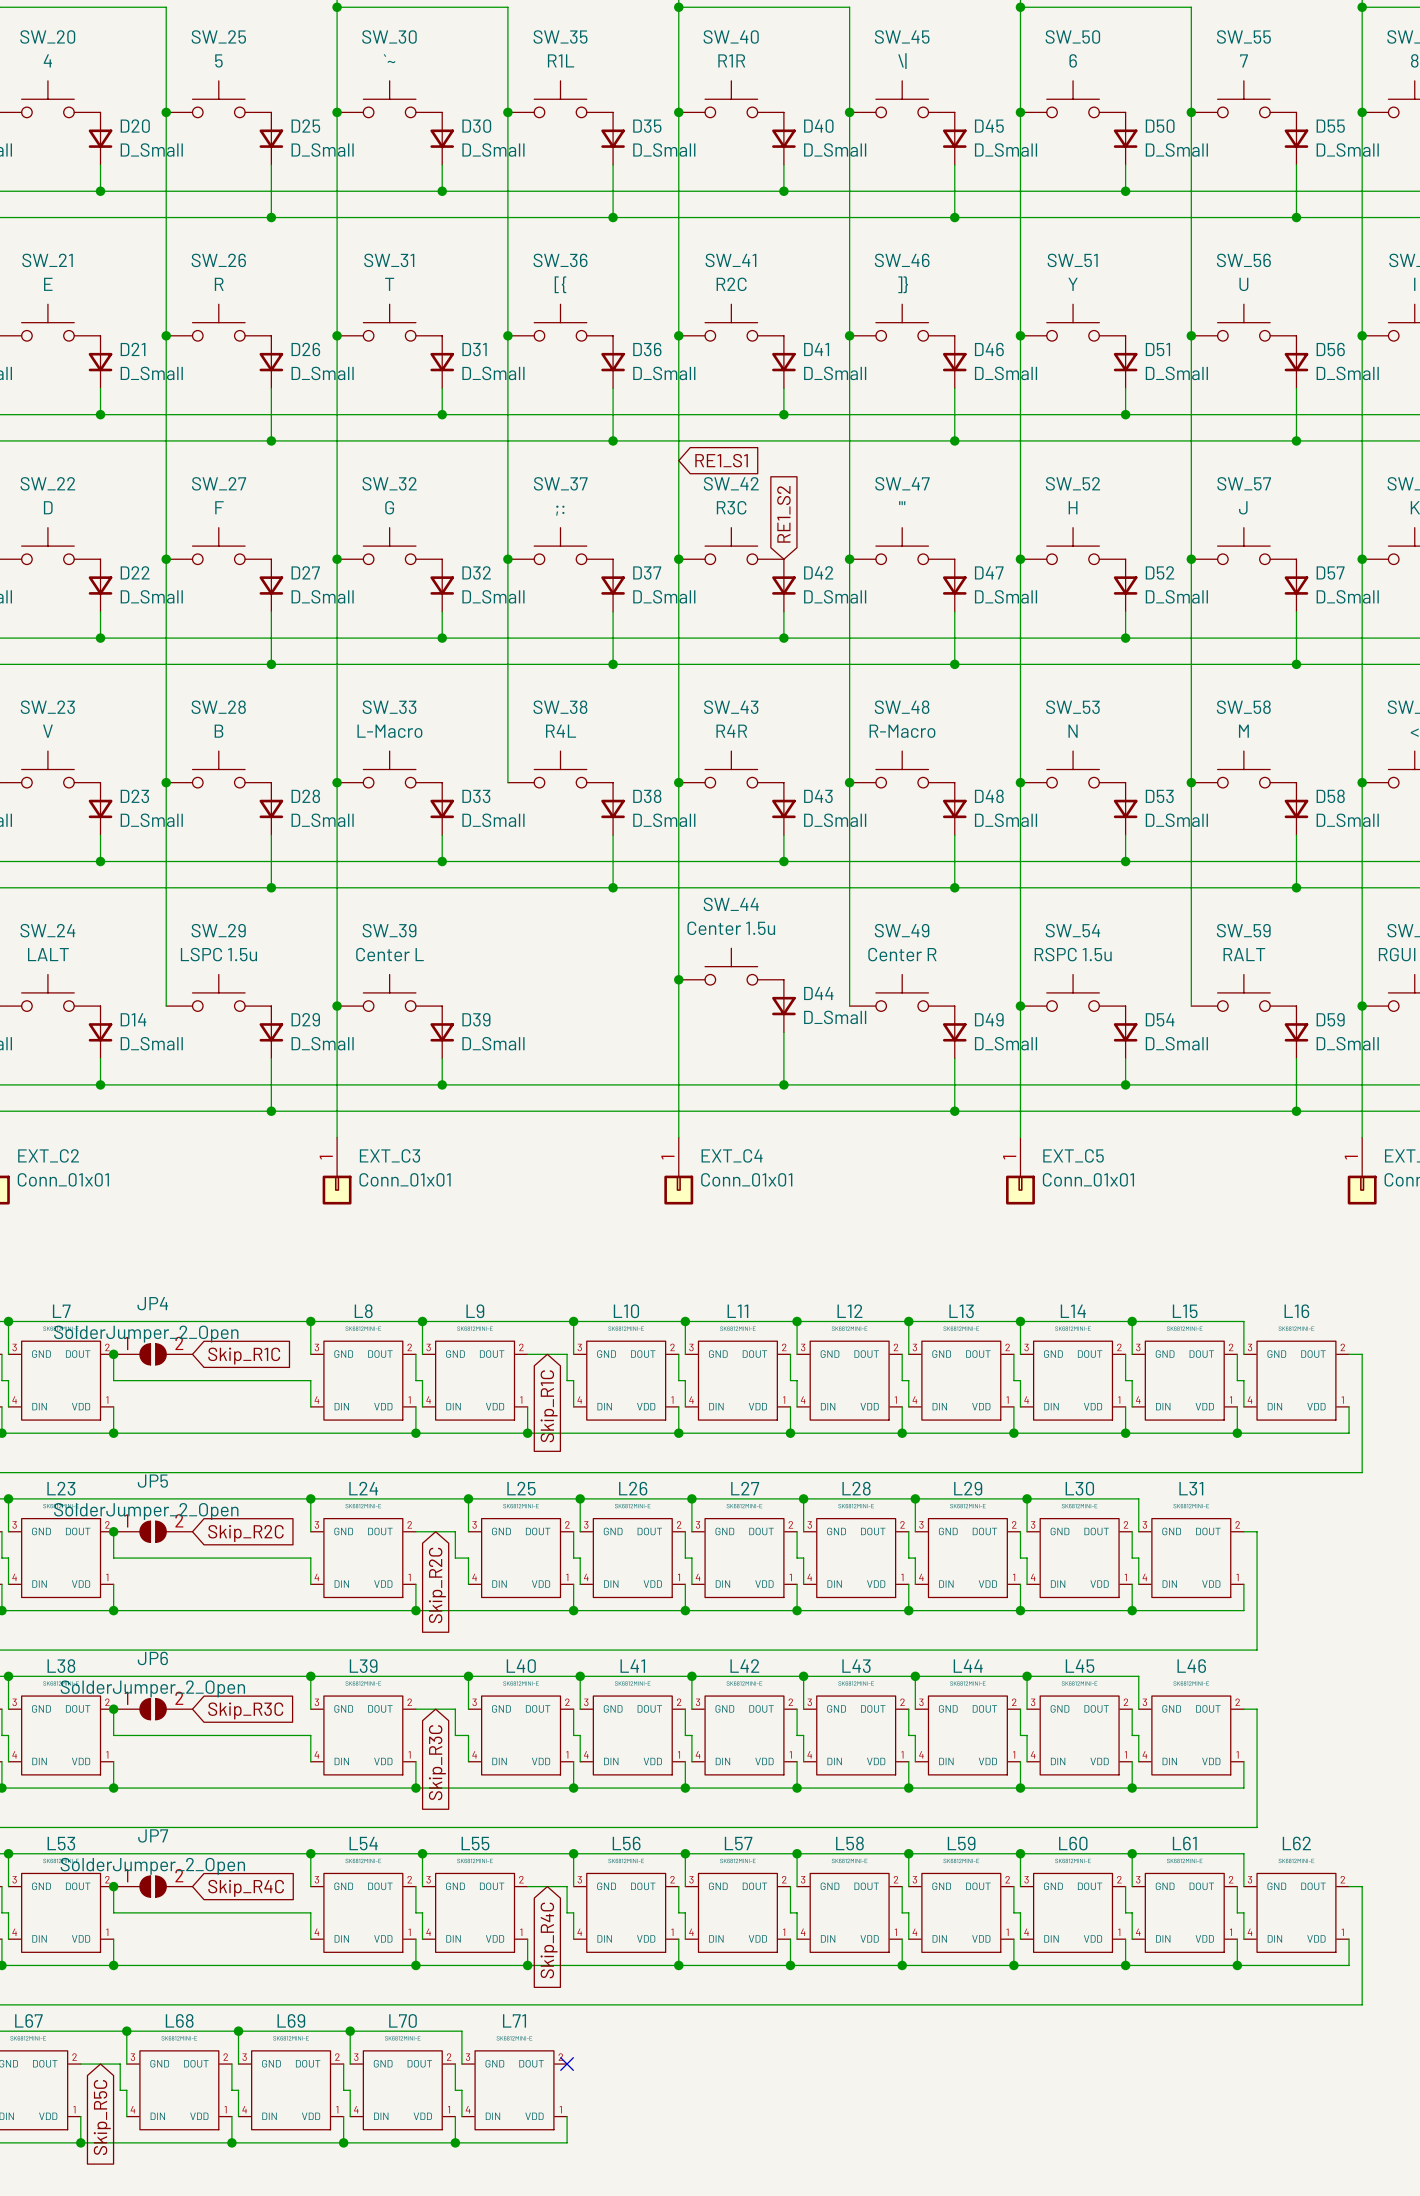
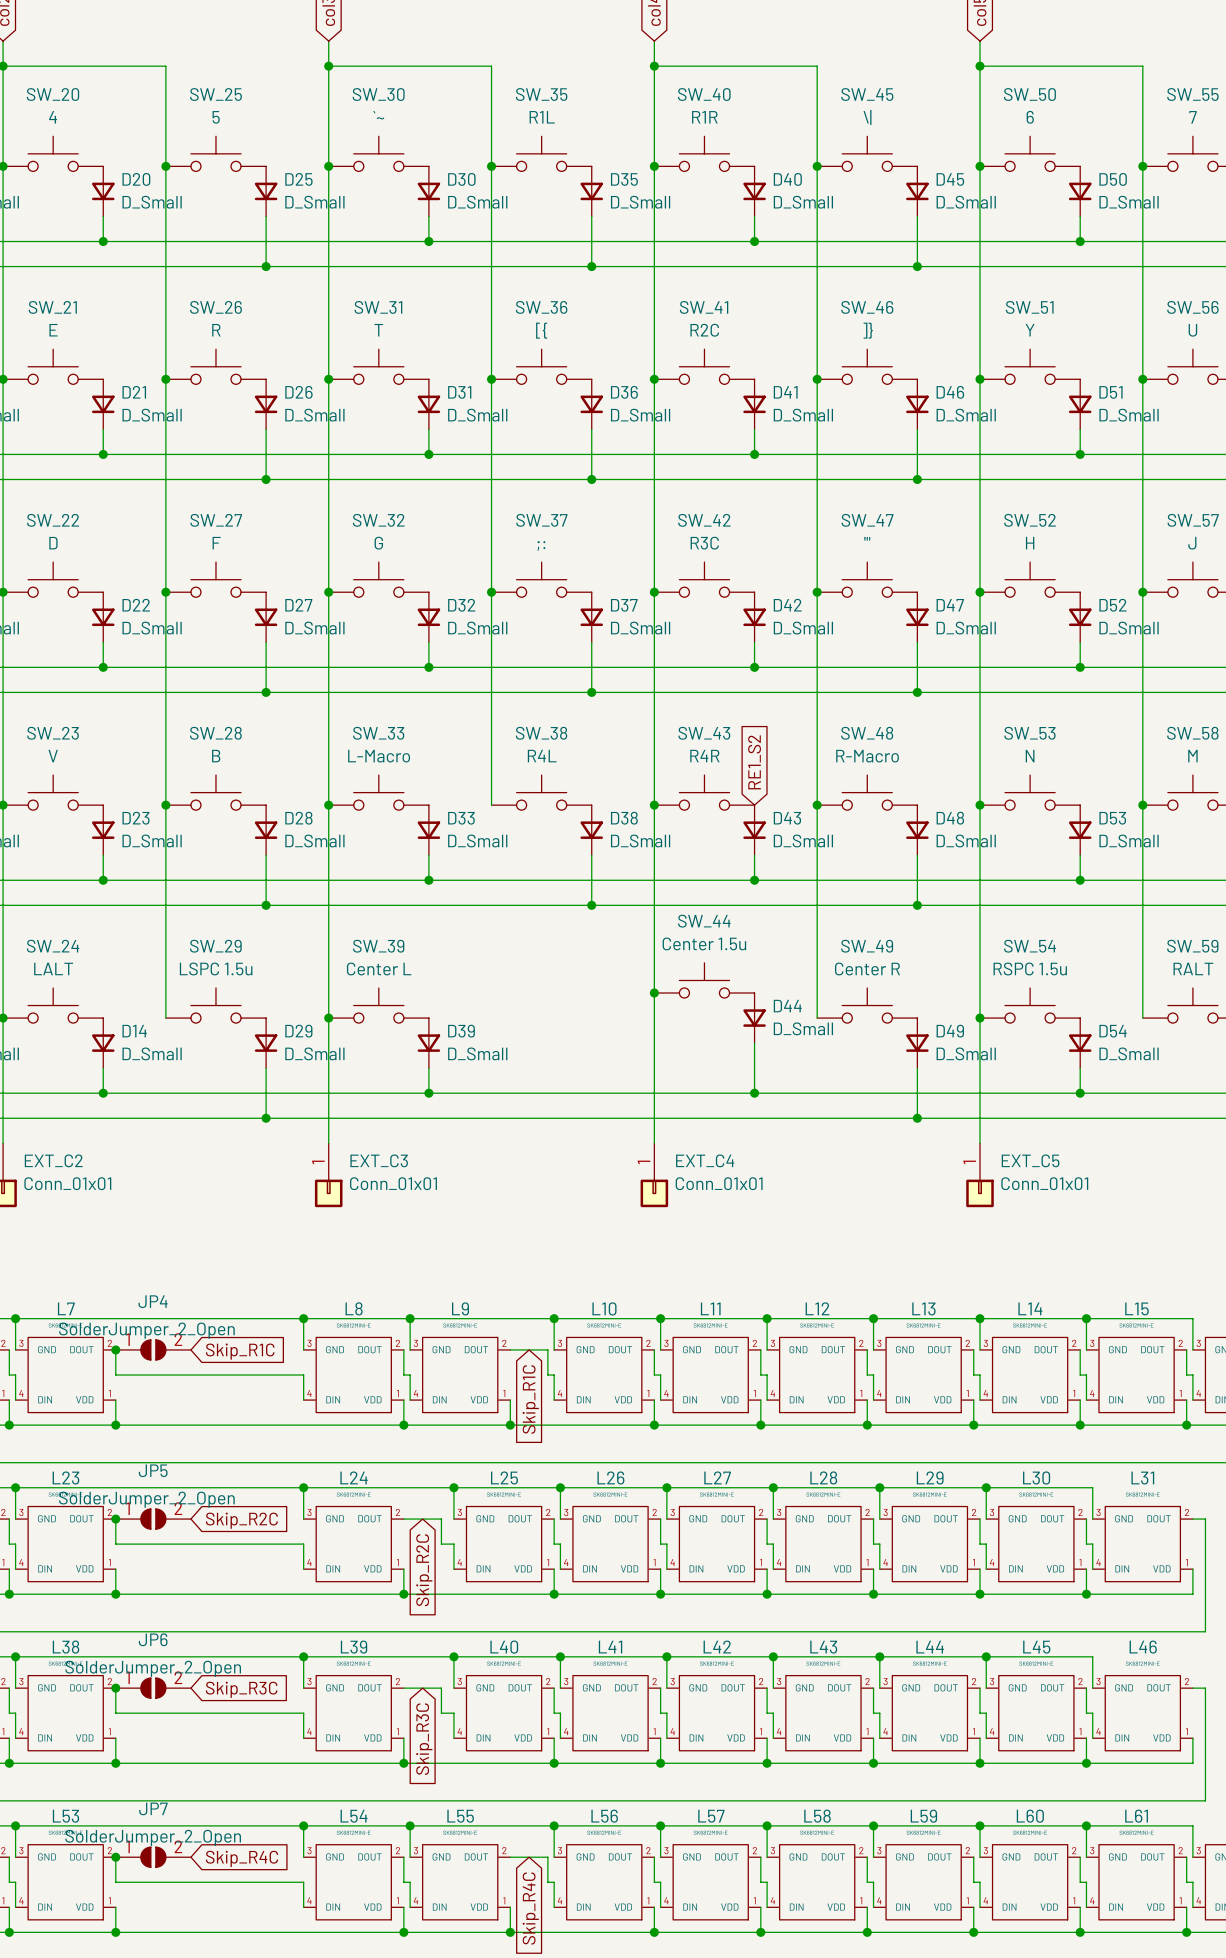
global label: RE1_S1 (721, 460) -> none
global label position: RE1_S2 (783, 514) -> RE1_S2 (754, 762)

